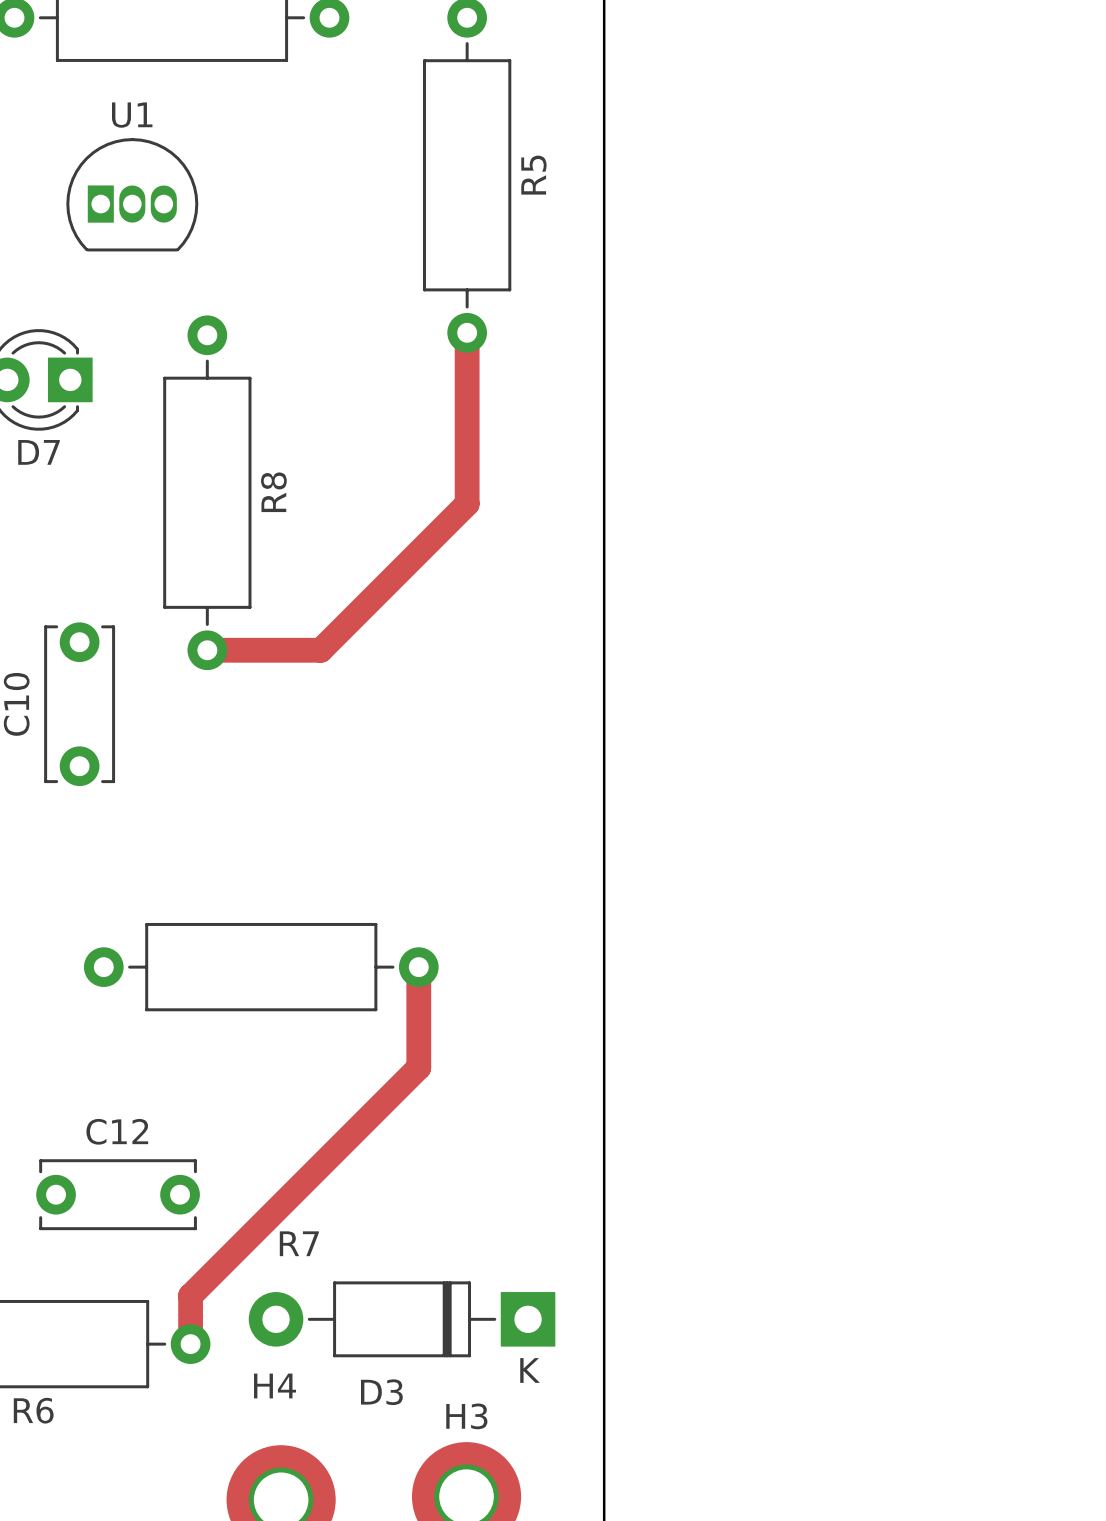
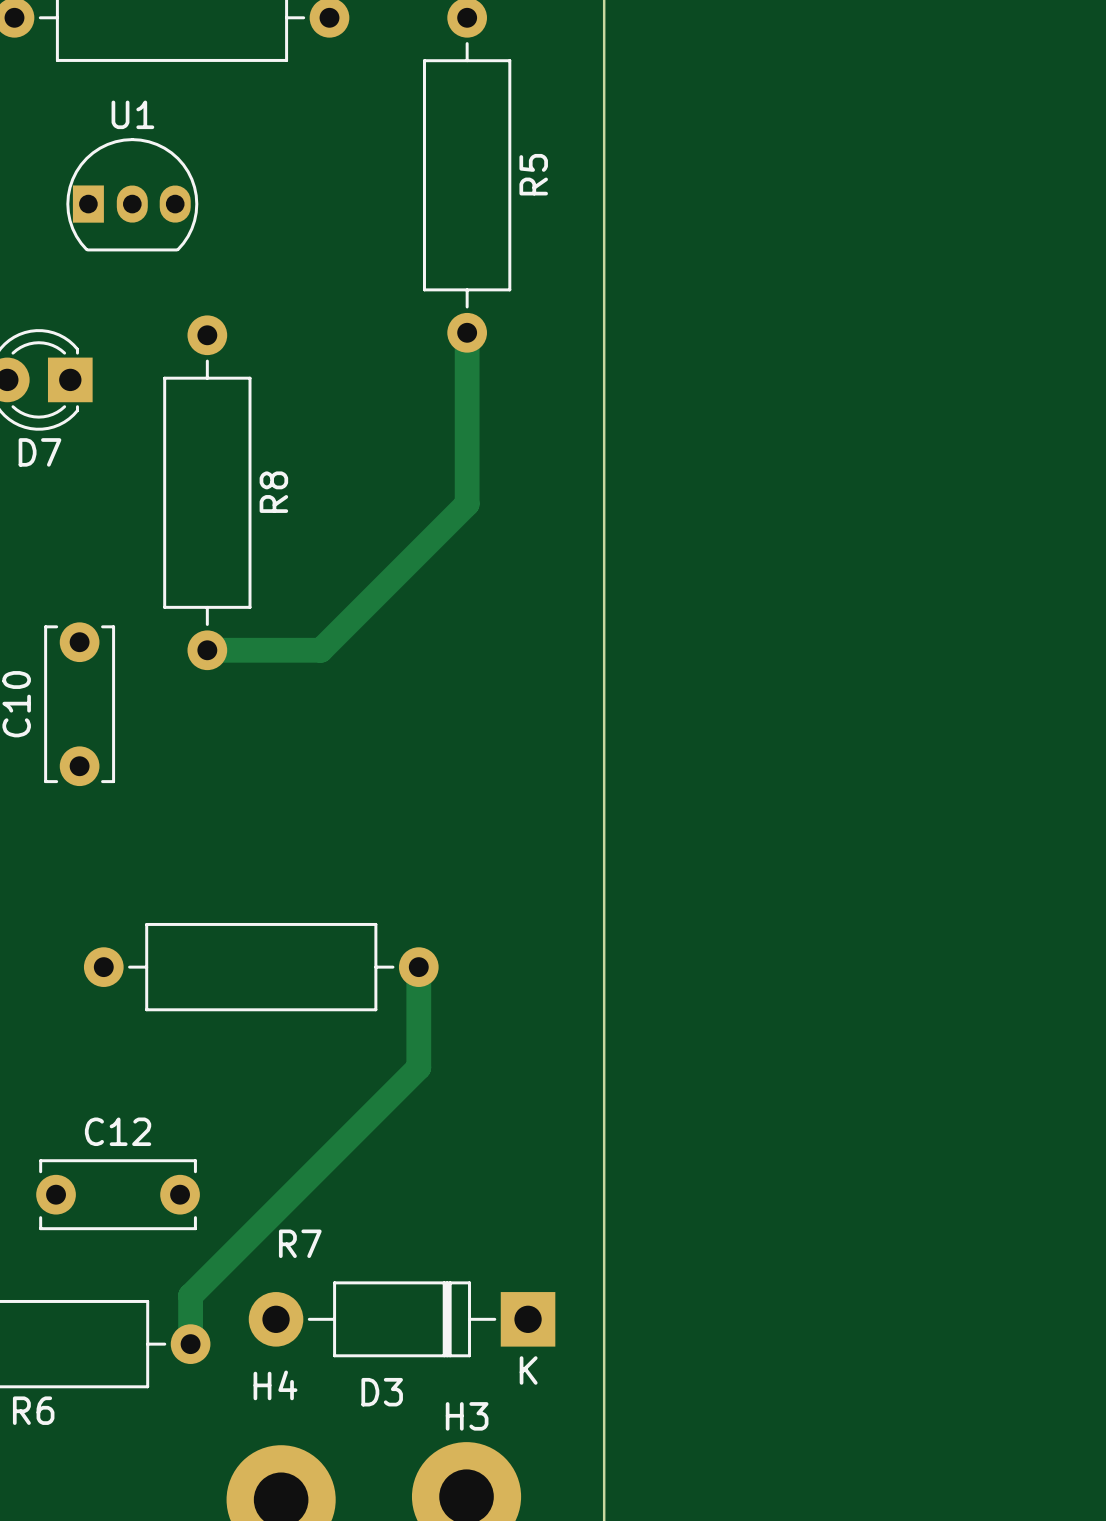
U1 footprint: [66, 138, 199, 252] -> [66, 138, 199, 252]

